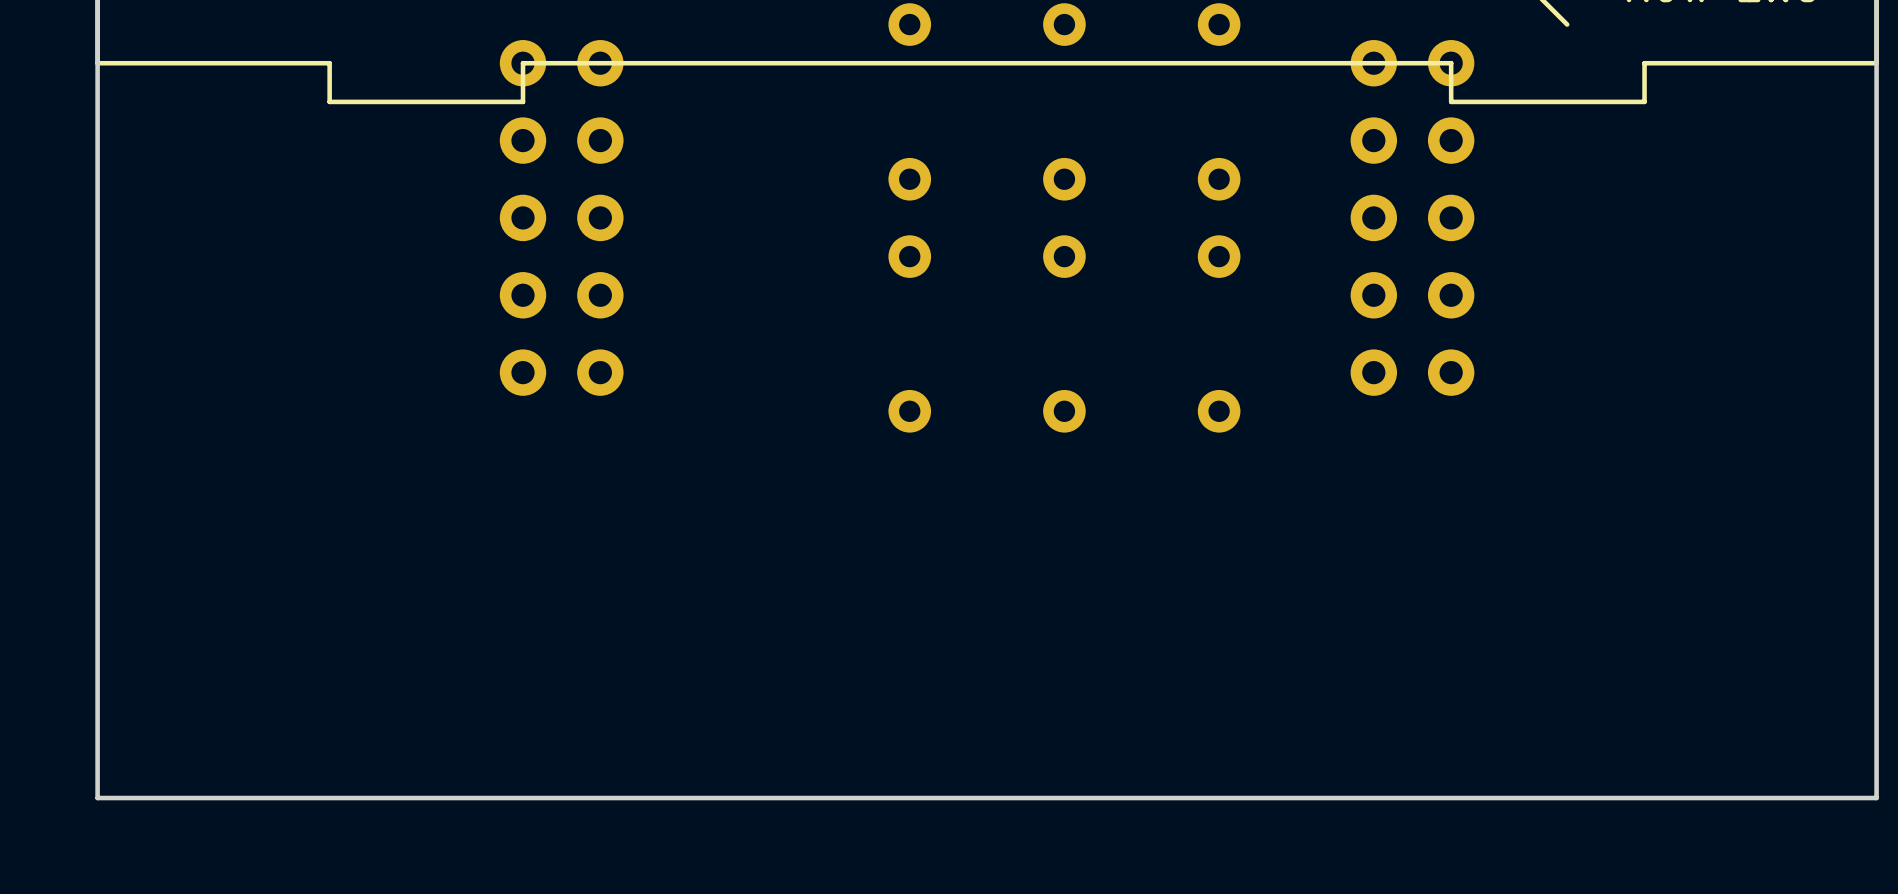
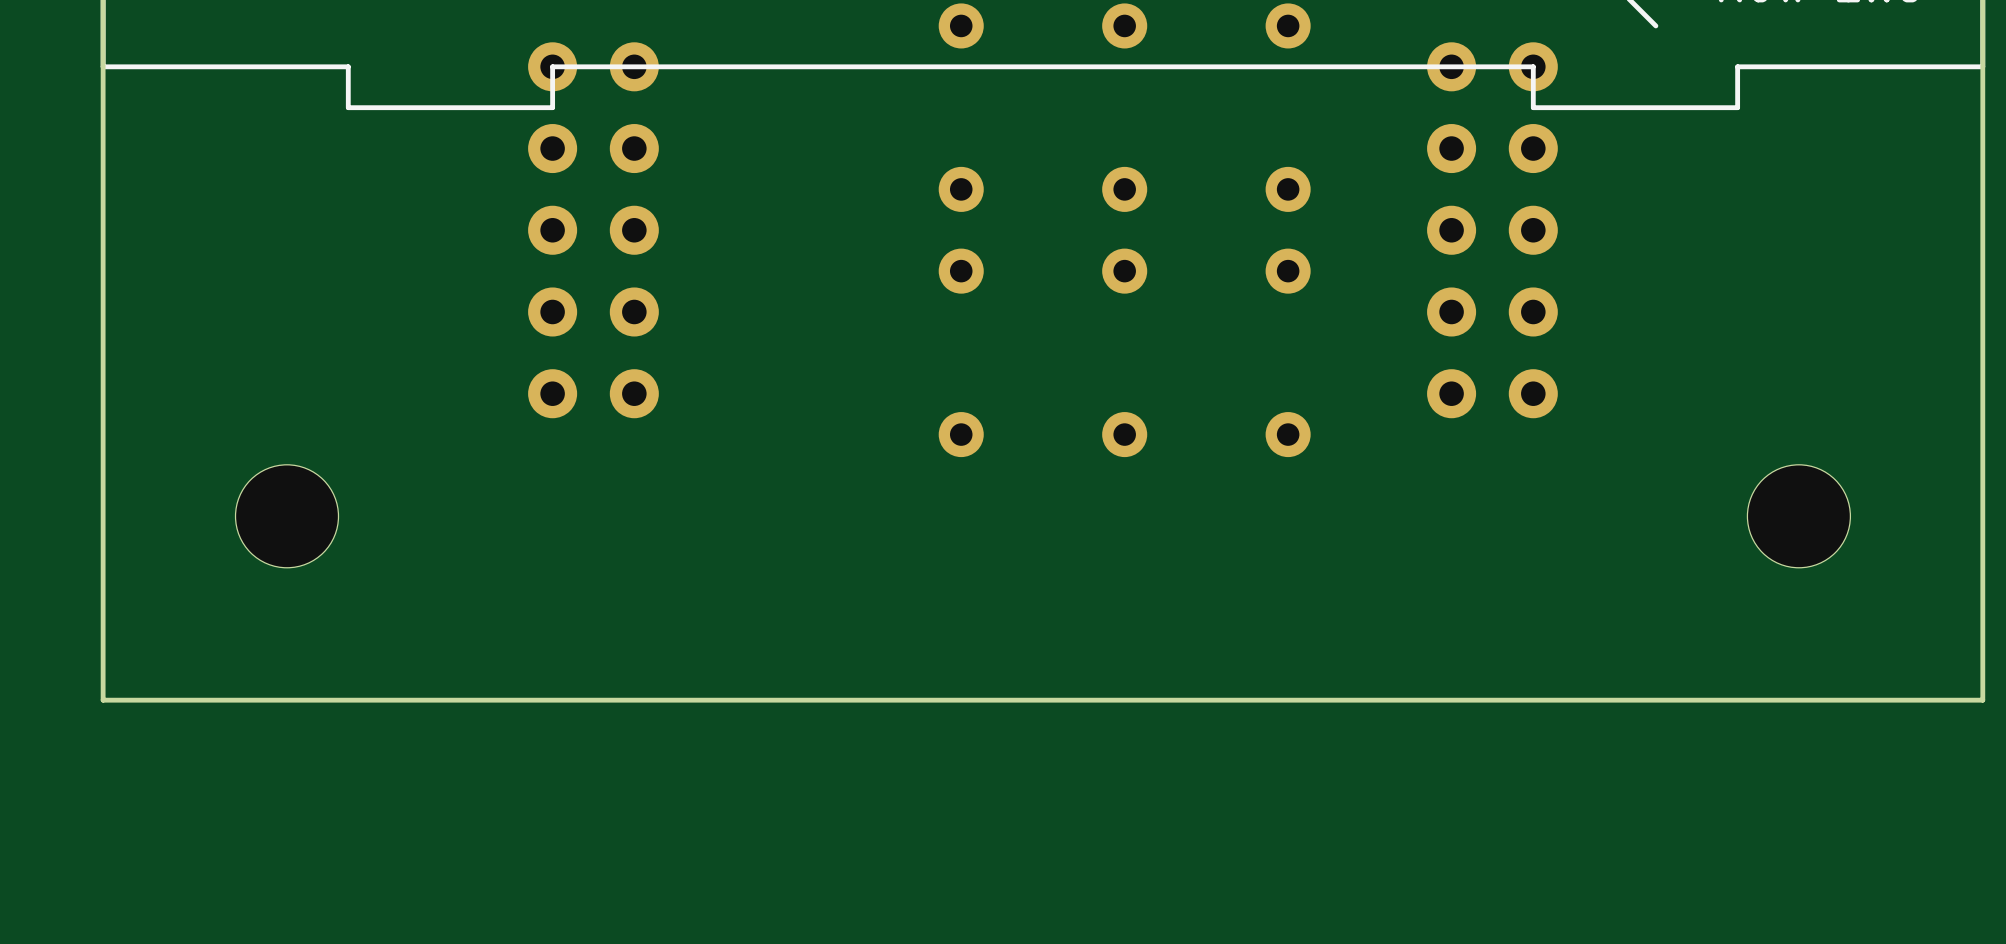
part: none -> (287, 516)
part: none -> (1798, 516)
board edge: (1876, 662) (1876, 798) (97, 798) (97, 662) -> (1982, 700) (103, 700)

